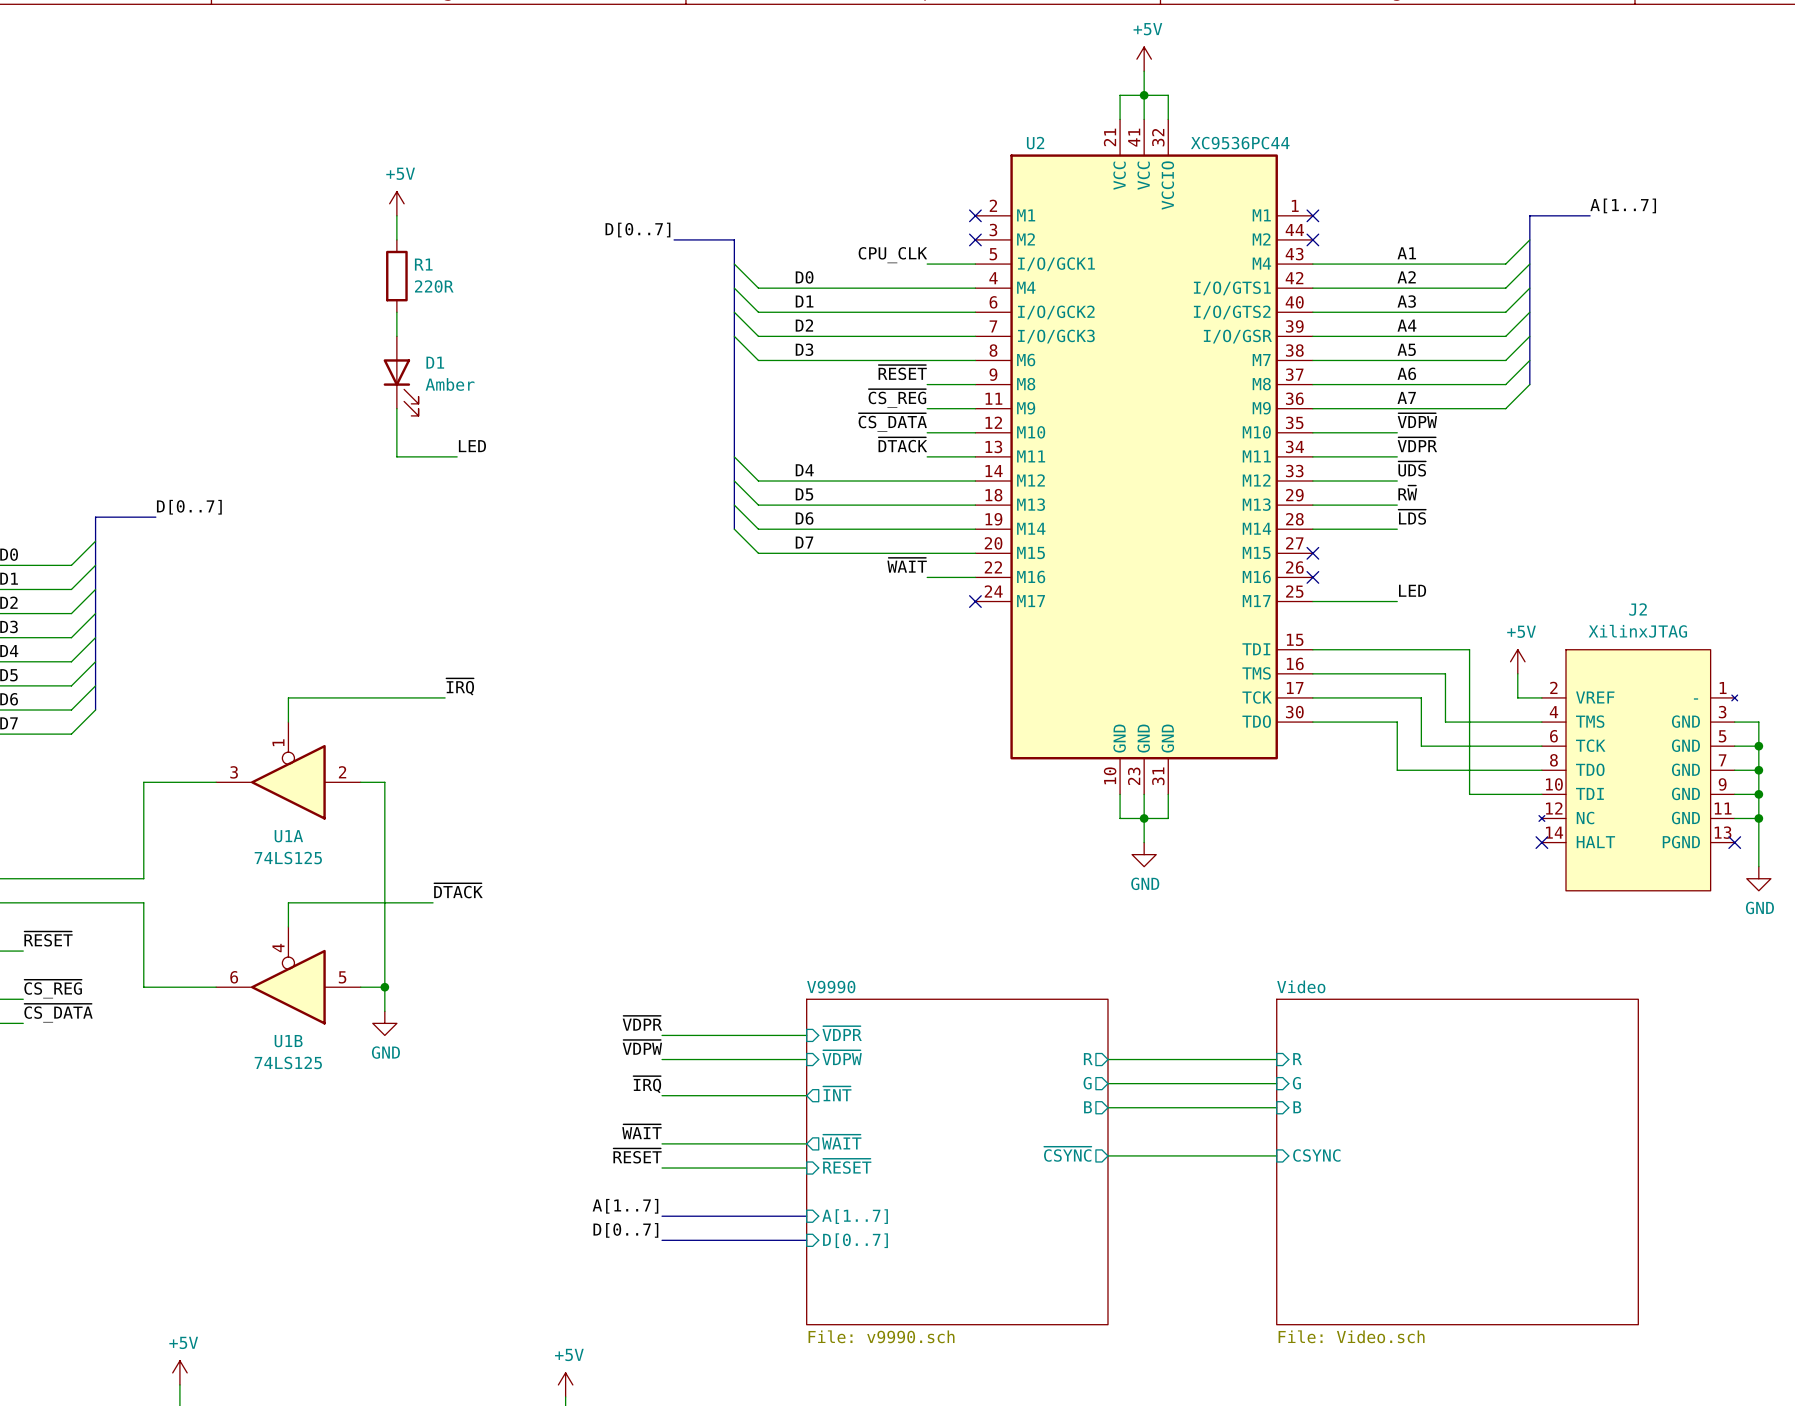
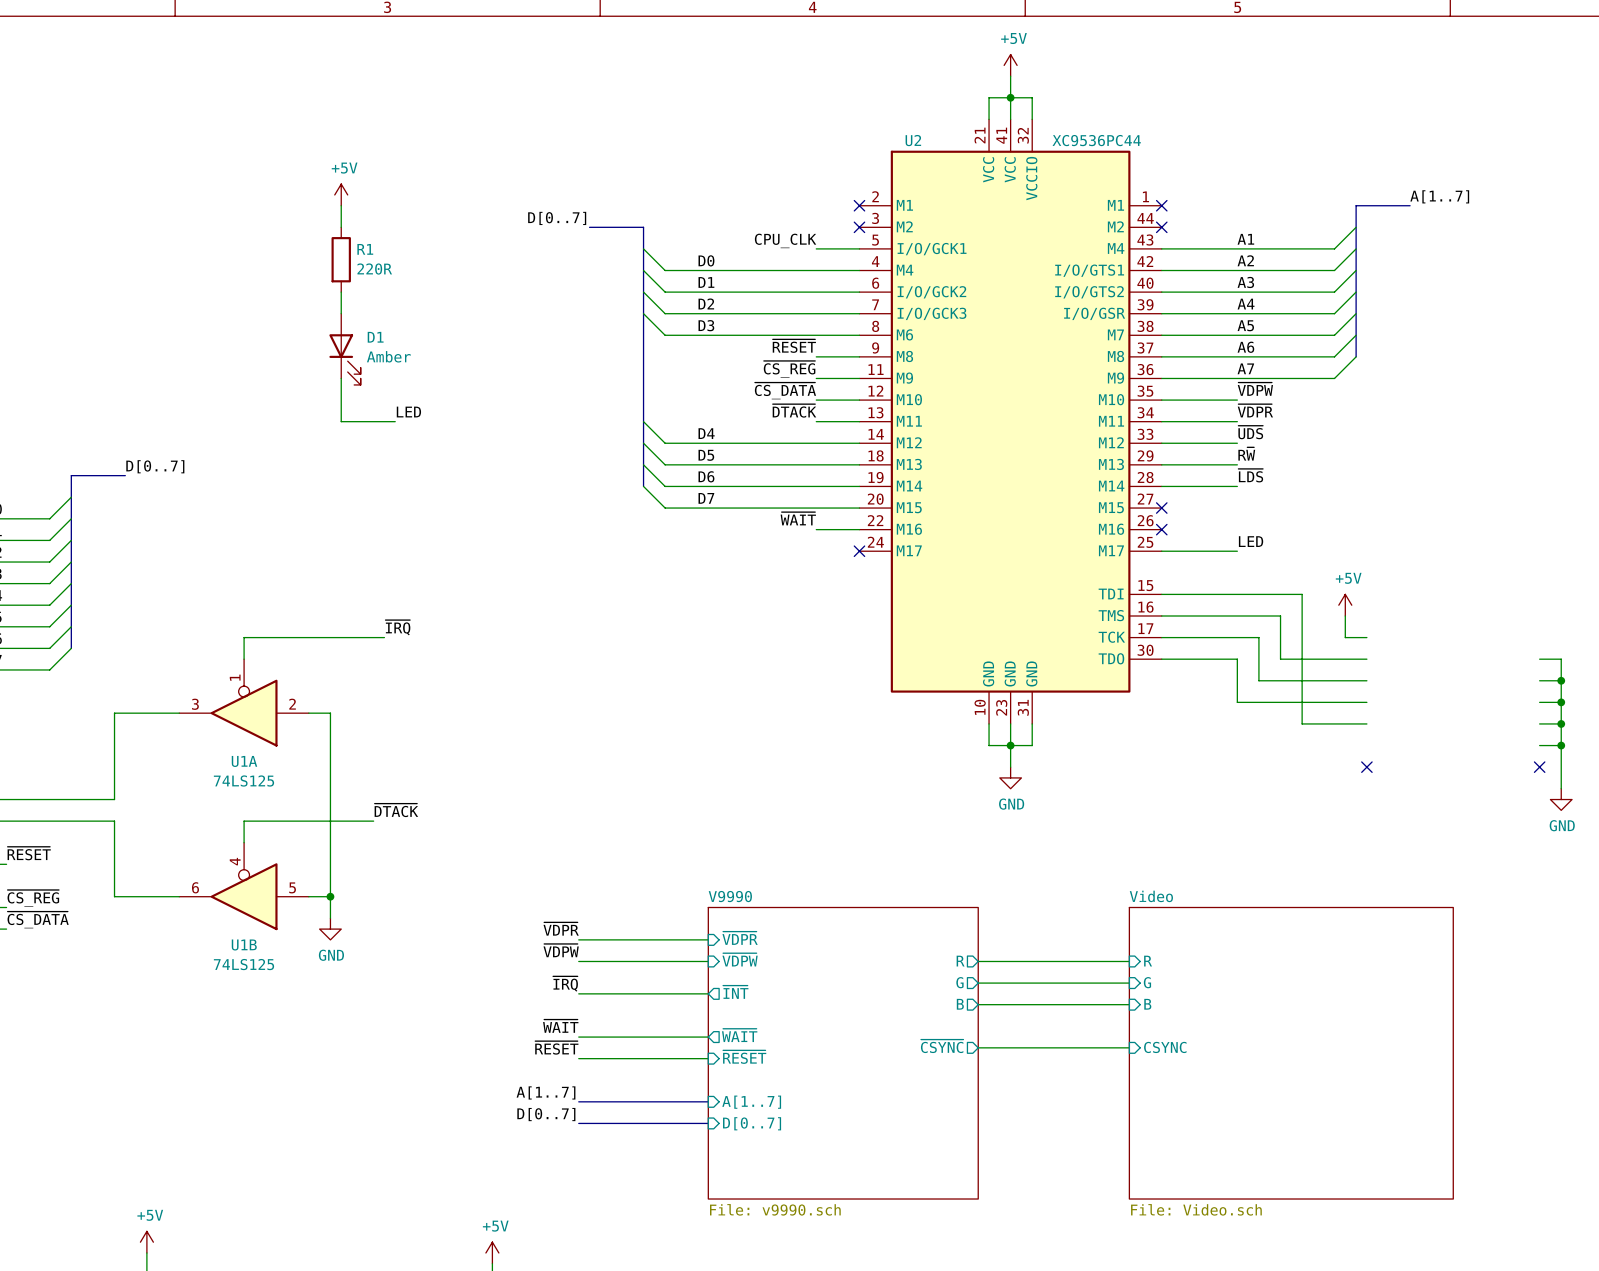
J2: XilinxJTAG (1638, 770) -> none

